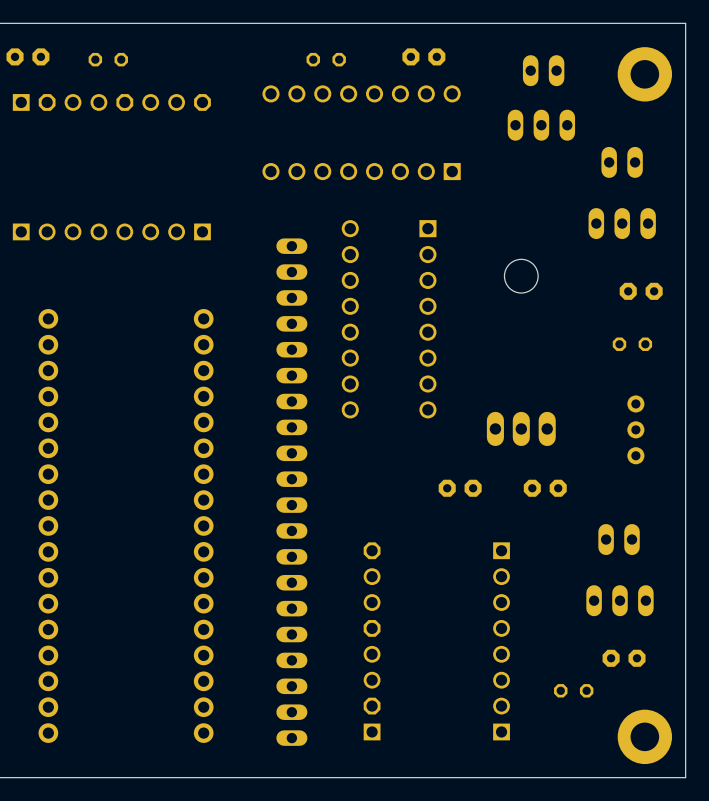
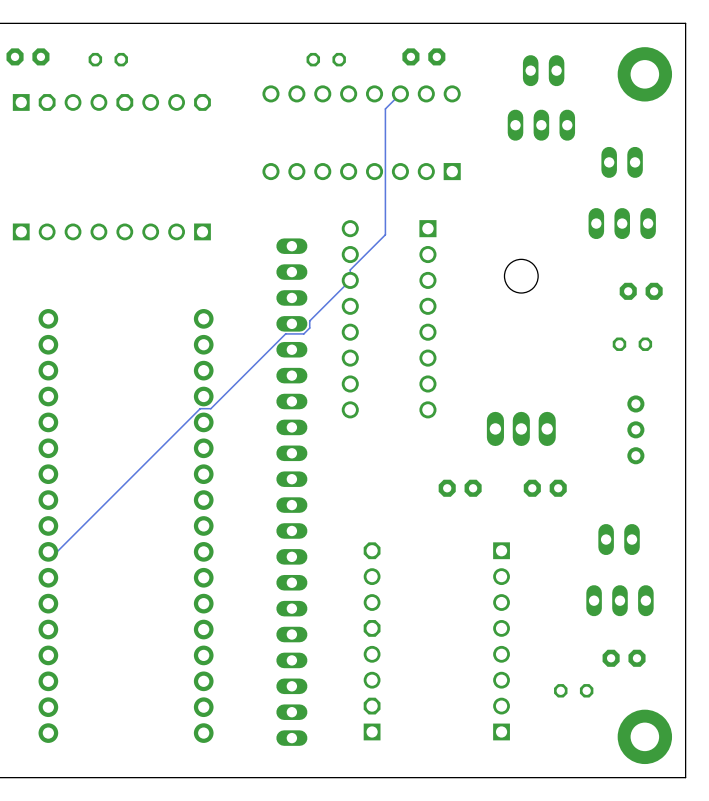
track: none -> (400, 93) (385, 108) (385, 234) (350, 269) (350, 280) (309, 320) (309, 328) (303, 333) (285, 333) (210, 408) (200, 408) (57, 551) (48, 551)

